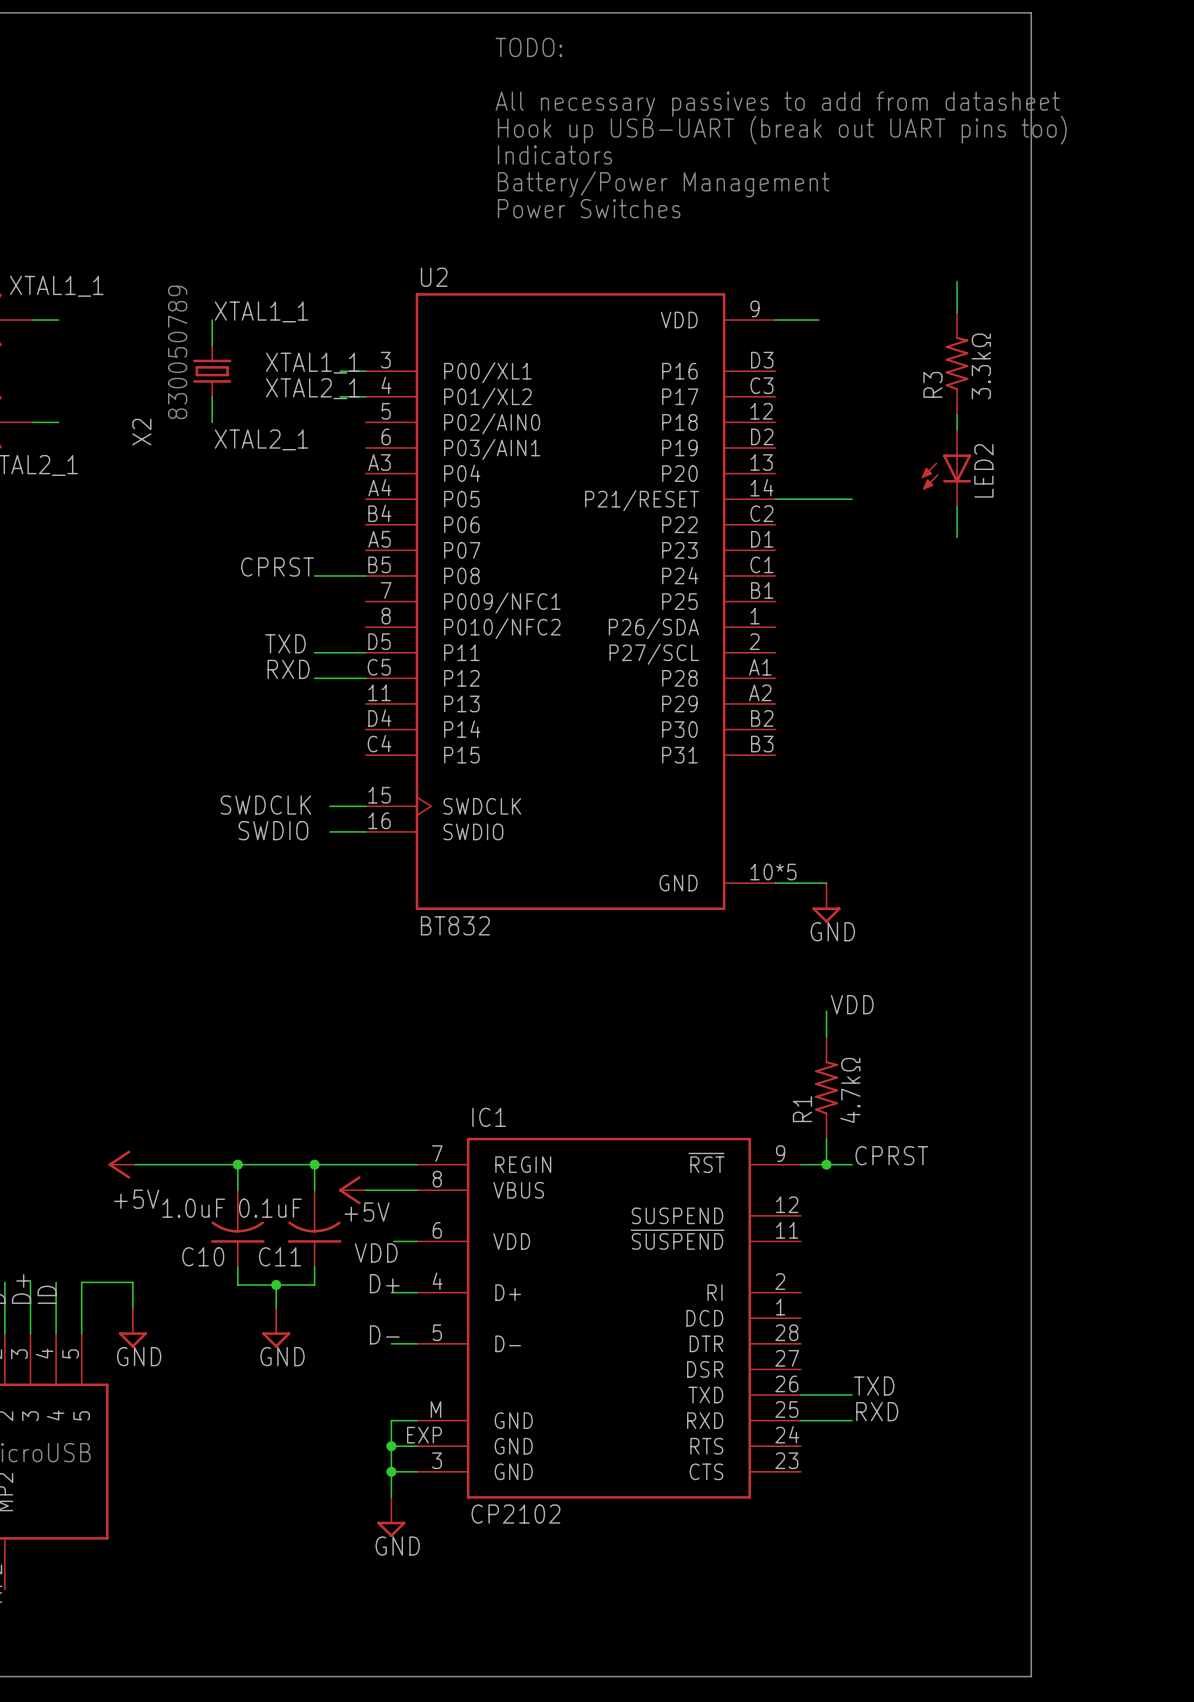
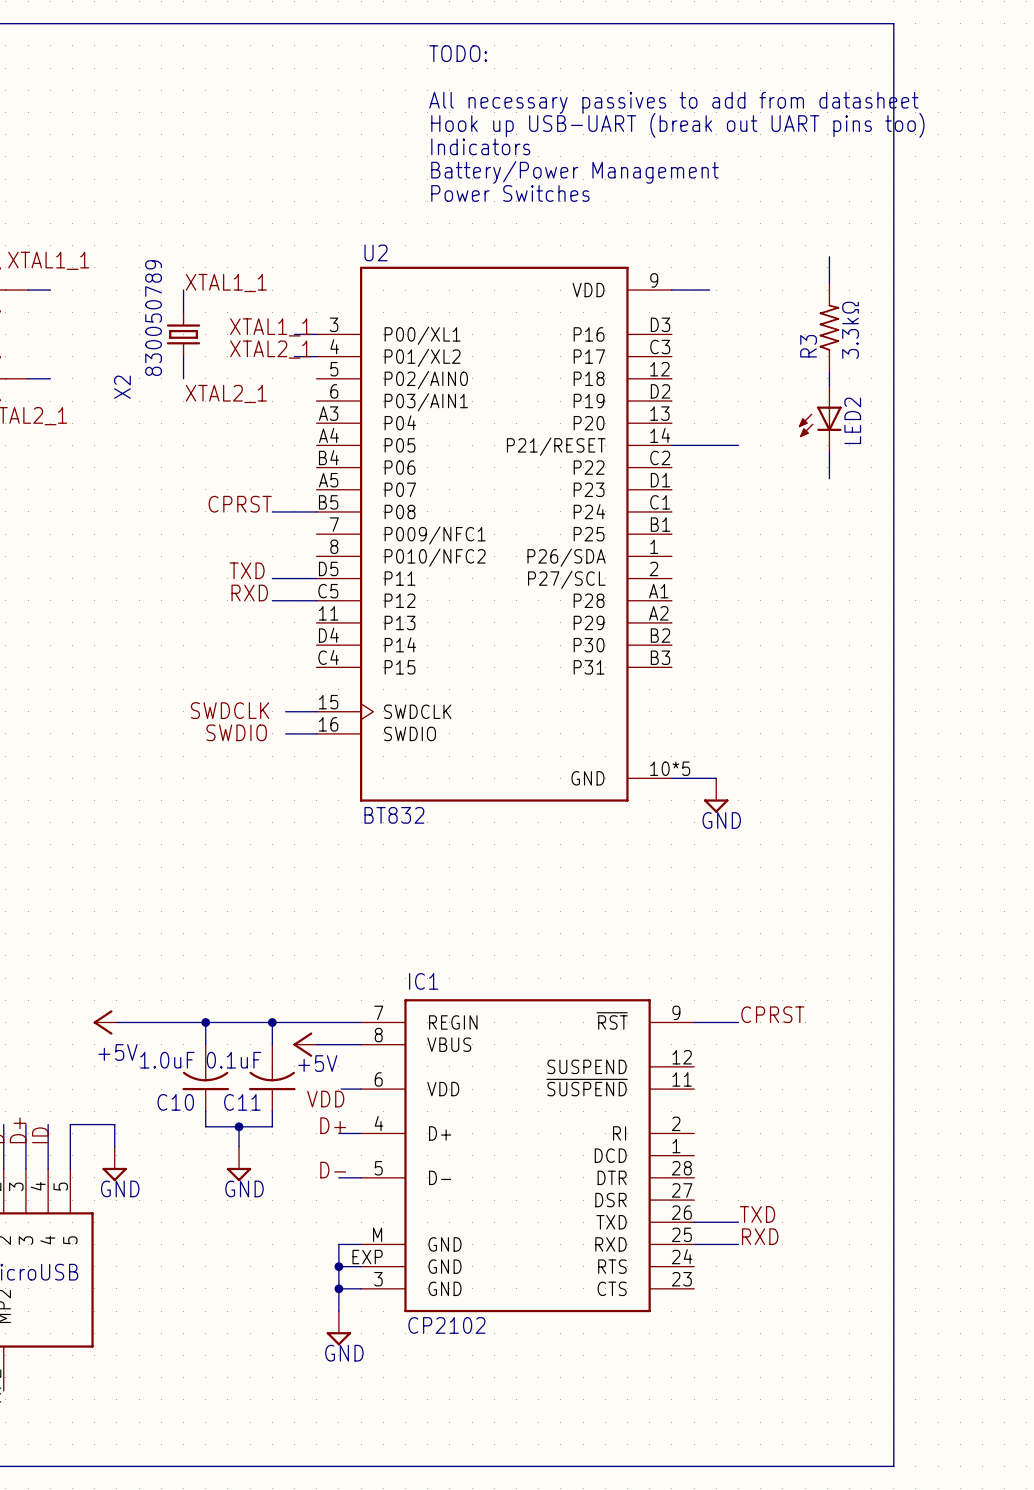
label: VDD (852, 1004) -> none
wire: (826, 1011) (826, 1036) -> none
R1: 4.7kΩ (826, 1087) -> none
wire: (826, 1139) (826, 1164) -> none
junction: (826, 1164) -> none

